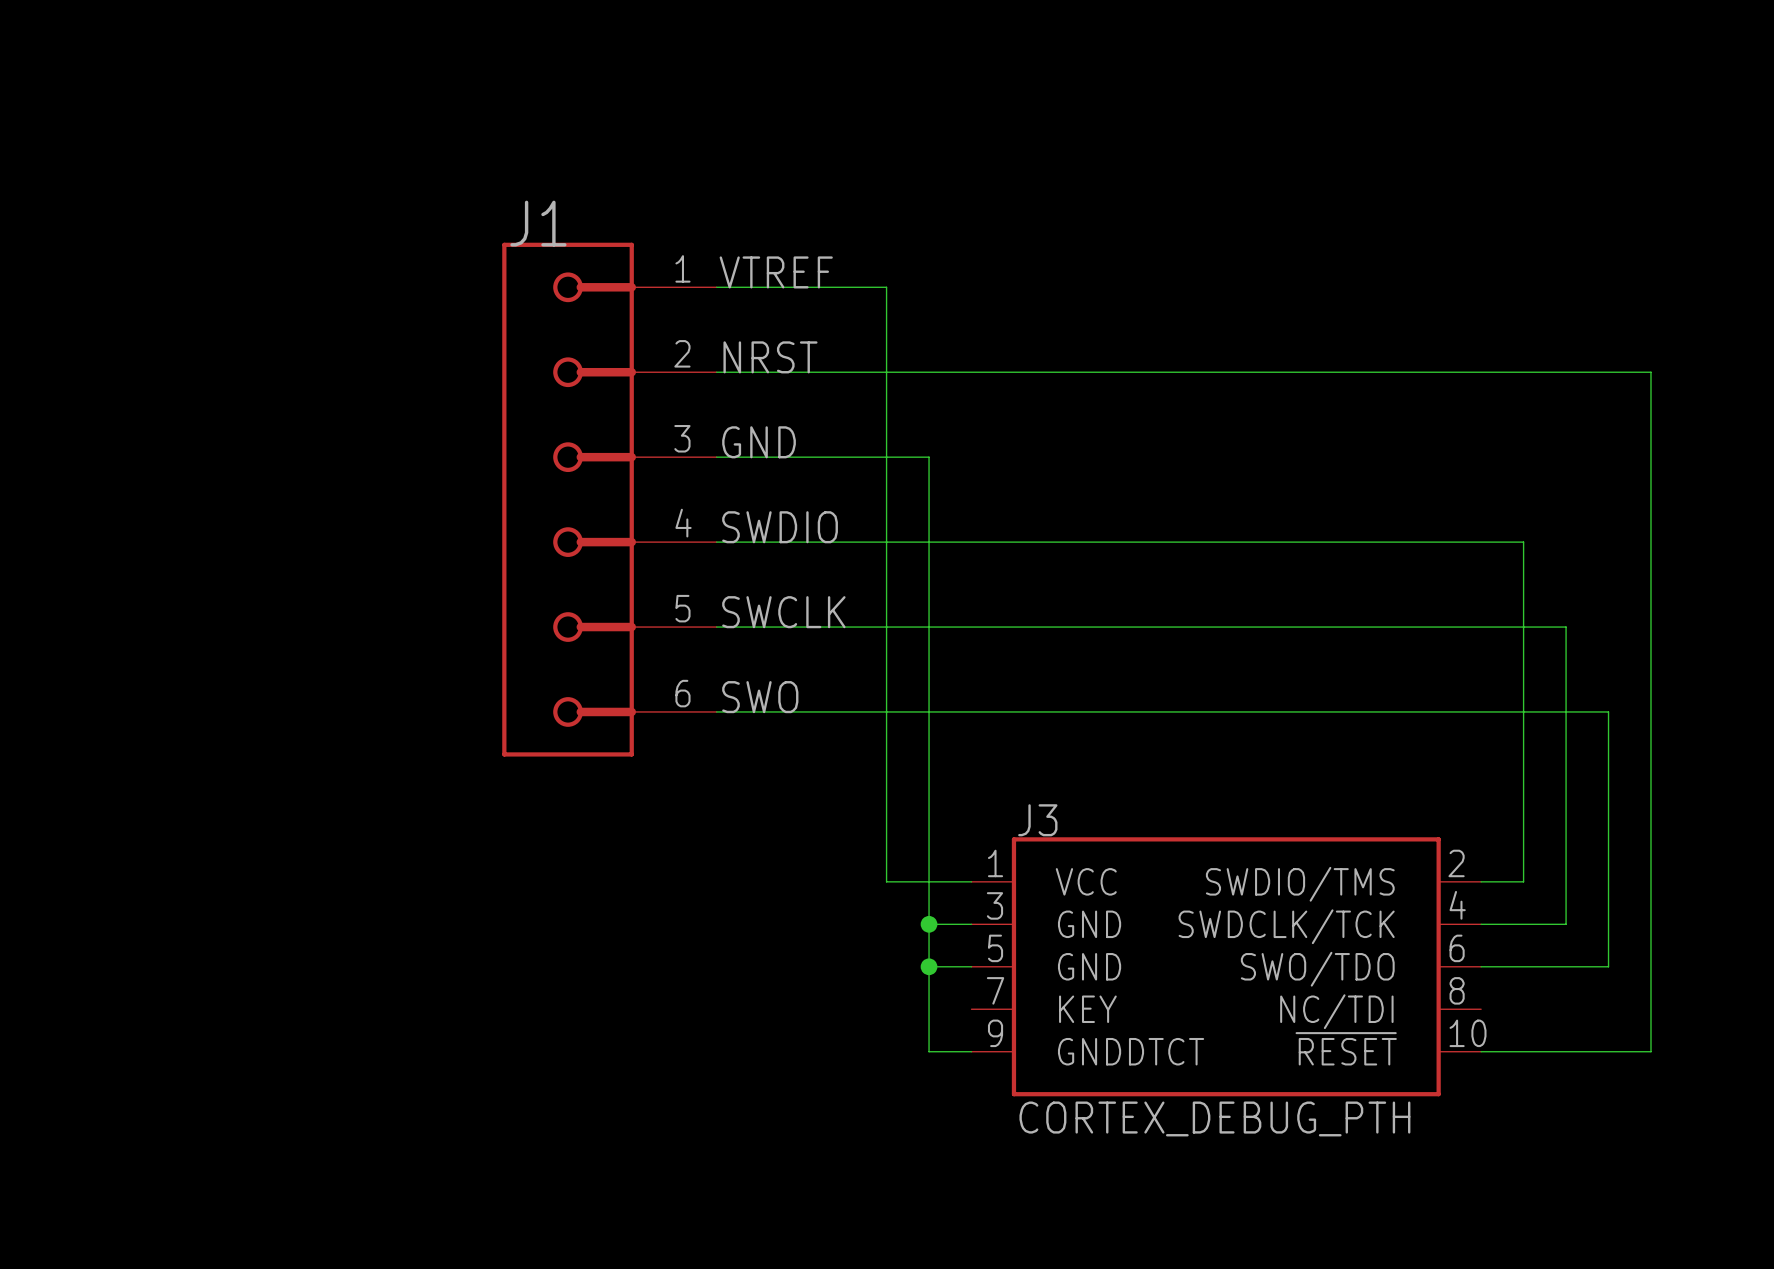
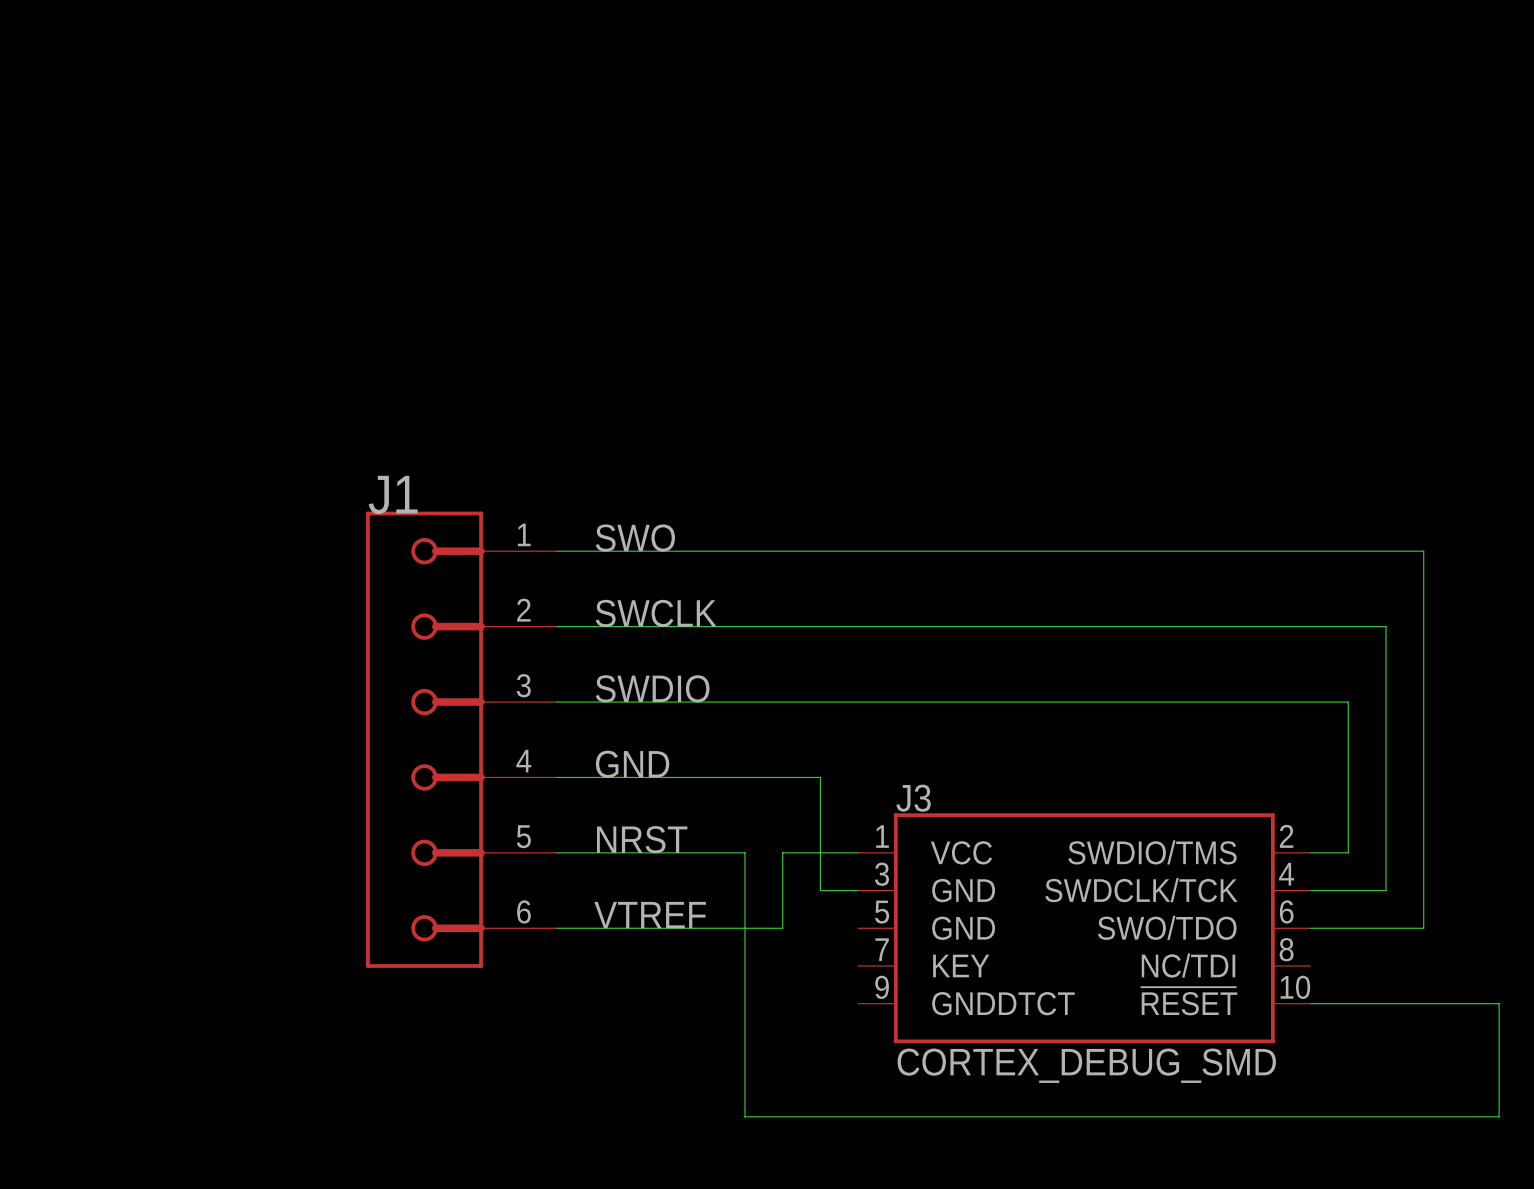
label: VTREF (776, 272) -> none
wire: (716, 287) (886, 287) (886, 881) -> (556, 928) (782, 928) (782, 852)
label: NRST (770, 357) -> none
wire: (716, 372) (1650, 372) (1650, 1051) -> (556, 852) (744, 852) (744, 1116) (1499, 1116) (1499, 1003) (1461, 1003)
label position: GND (759, 442) -> GND (632, 764)
wire: (716, 457) (929, 457) (929, 796) -> (556, 777) (820, 777)
J1 position: (609, 499) -> (461, 739)
label position: SWDIO (780, 527) -> SWDIO (652, 688)
wire: (1523, 542) (1523, 711) (1608, 711) -> (1348, 551) (1423, 551) (1423, 702)
label position: SWCLK (783, 612) -> SWCLK (656, 613)
label position: SWO (760, 697) -> SWO (635, 538)
label: none -> NRST (642, 839)
wire: (929, 924) (929, 1051) (971, 1051) -> none
junction: (929, 924) -> none
label: none -> VTREF (650, 915)
wire: (929, 966) (971, 966) -> none
junction: (929, 966) -> none
J3 value: CORTEX_DEBUG_PTH (1214, 1118) -> CORTEX_DEBUG_SMD (1086, 1065)

